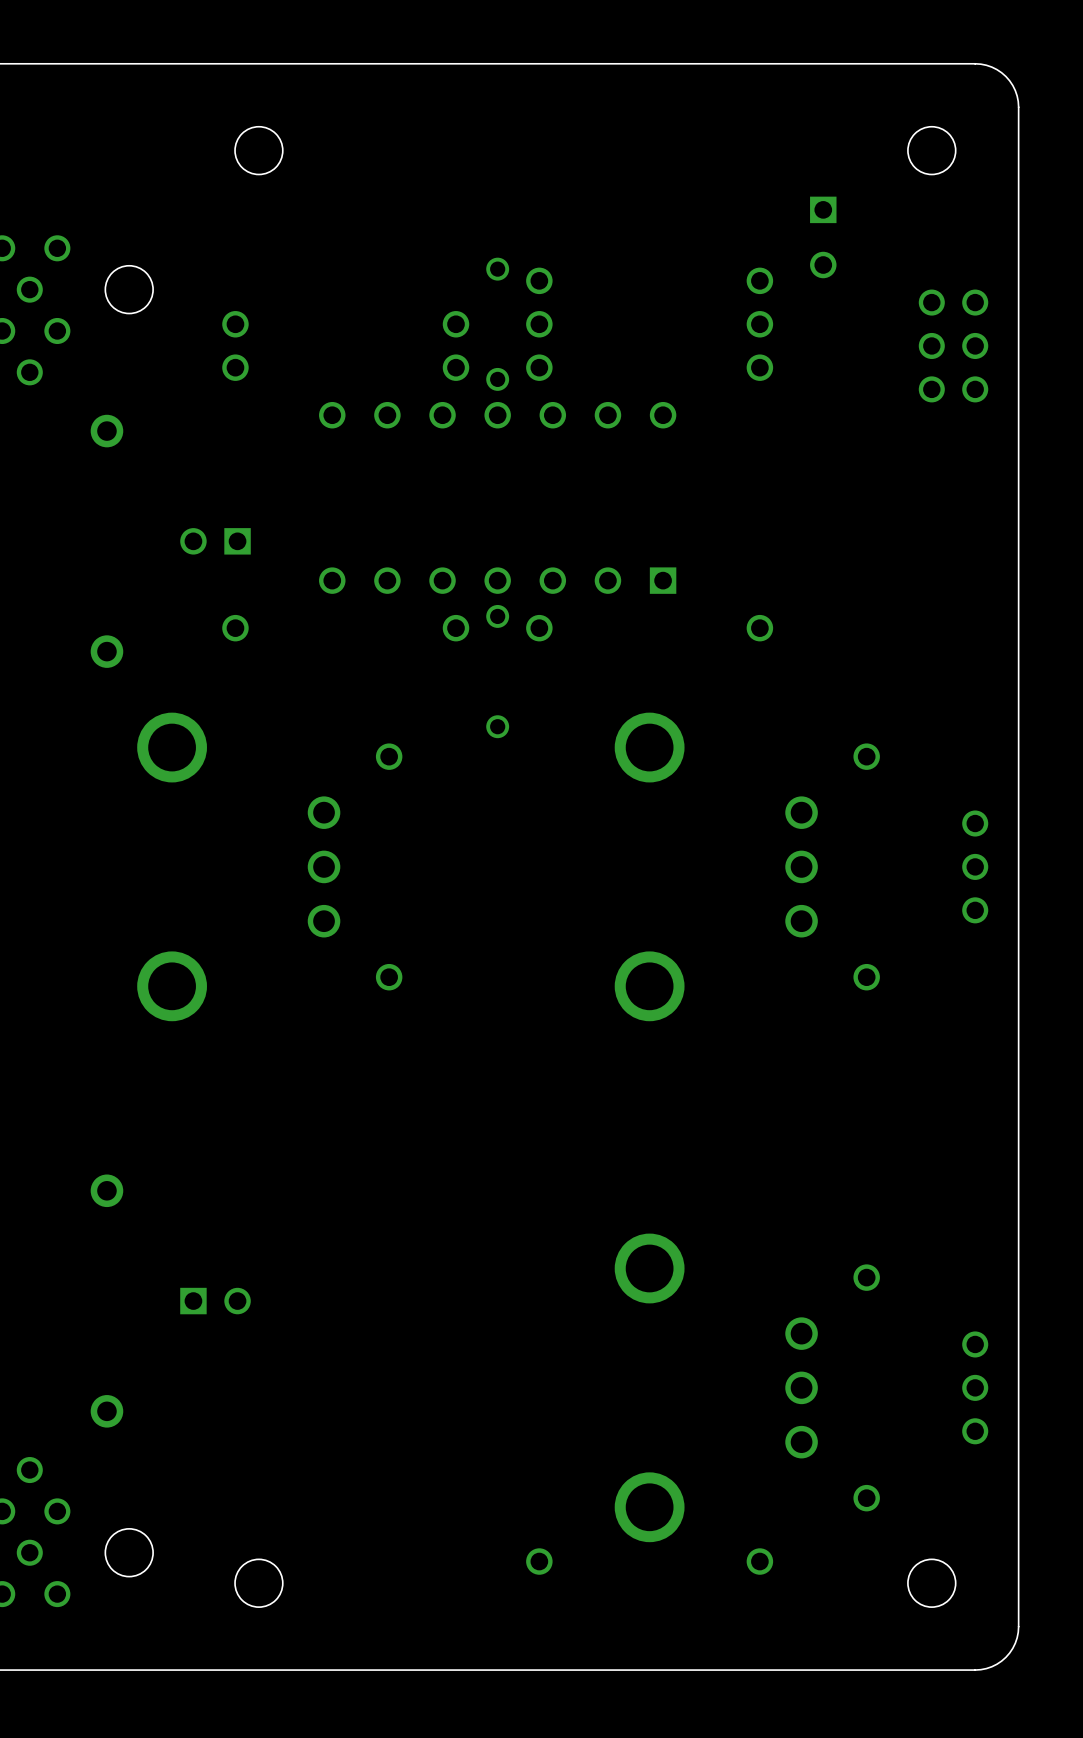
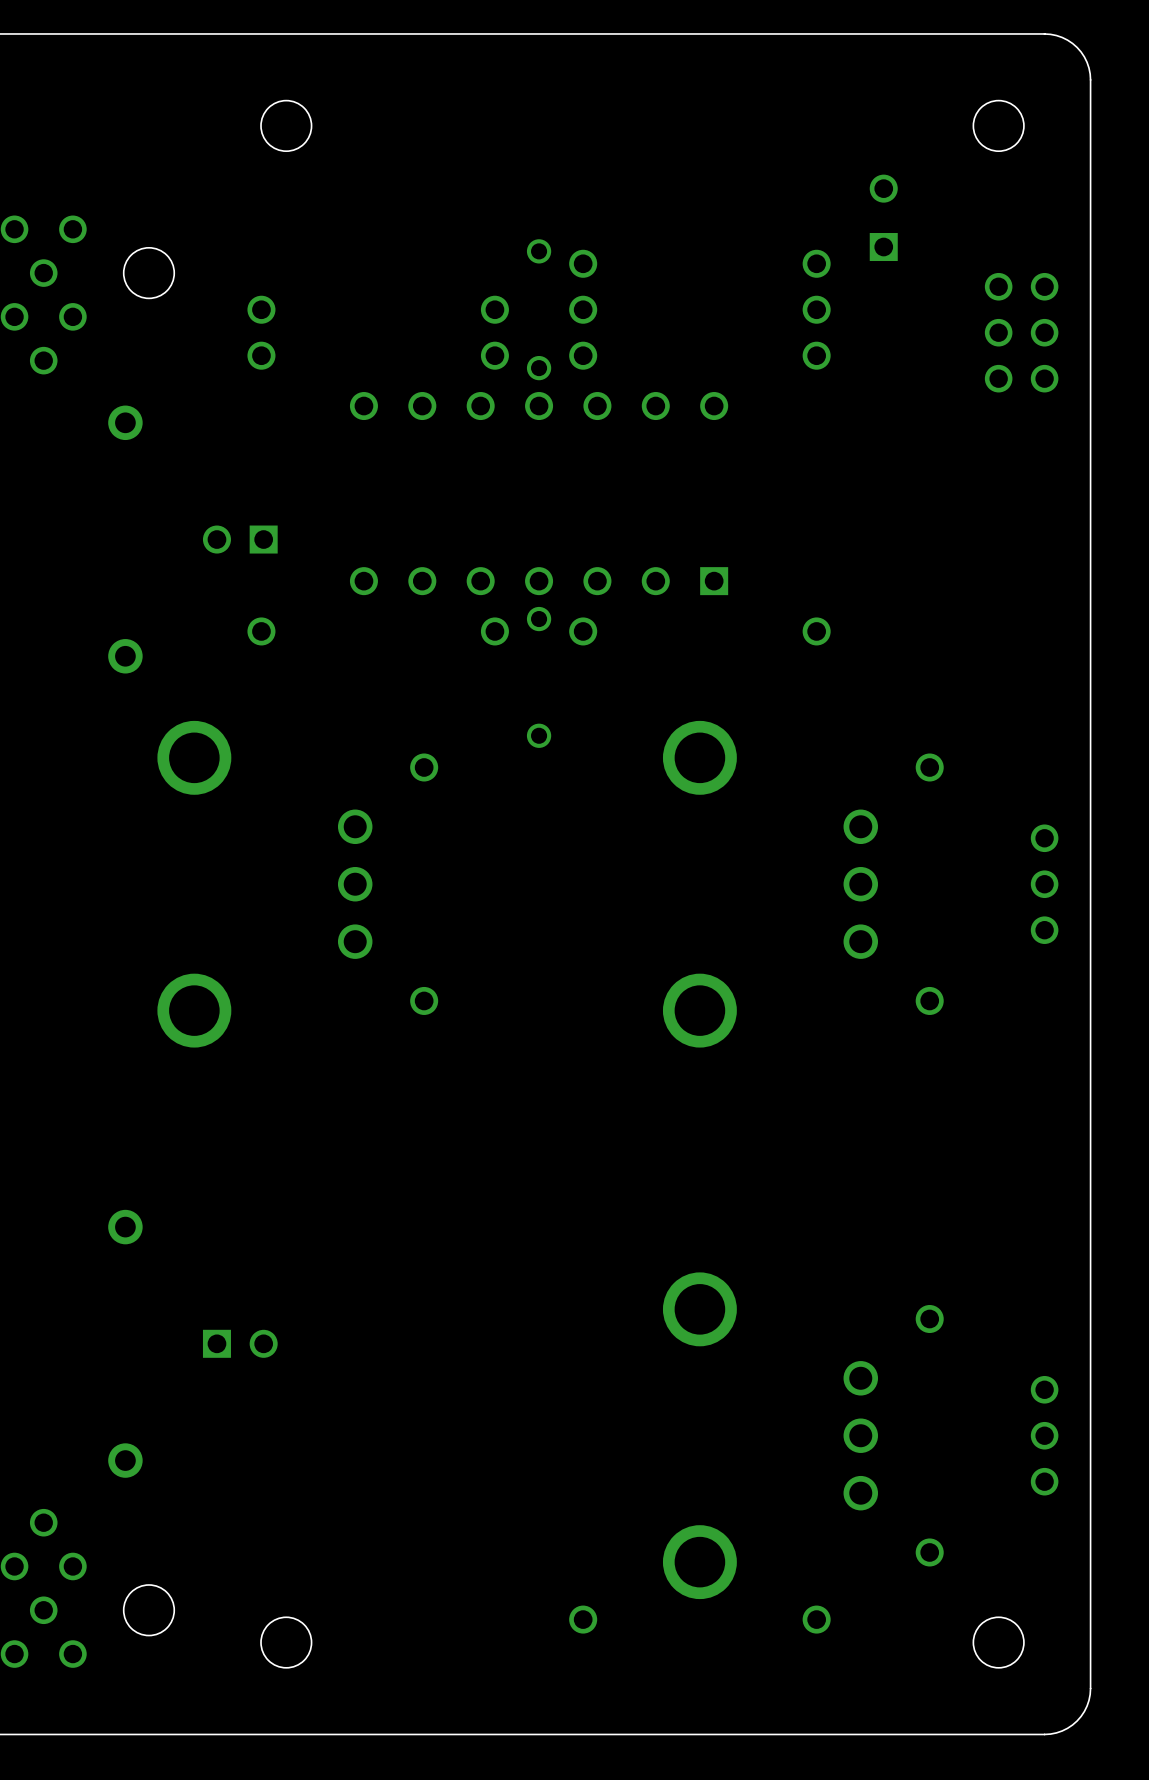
part rotation: 0° (823, 237) -> 180° (883, 217)

